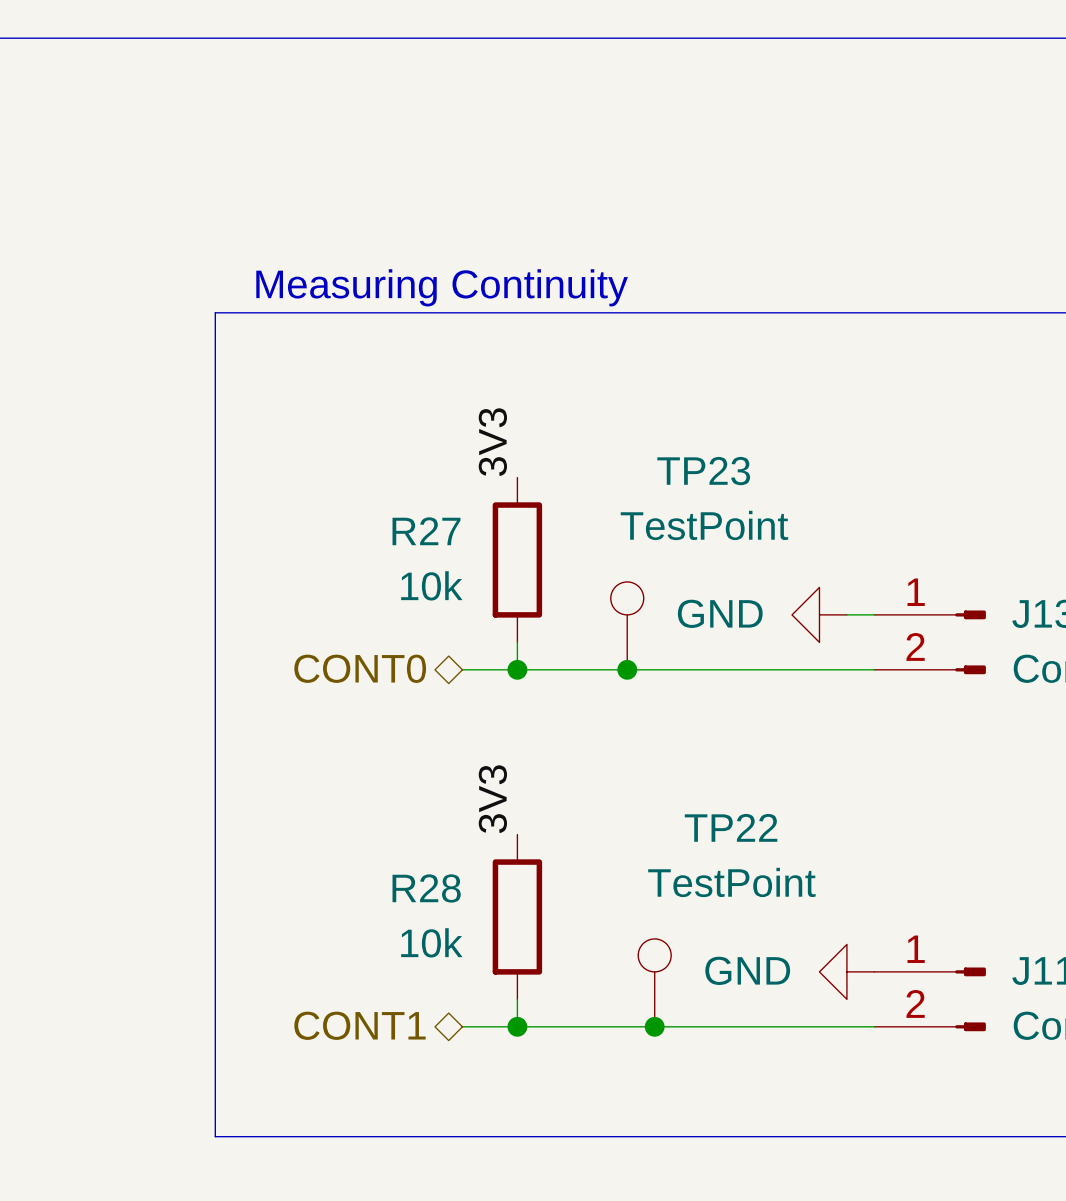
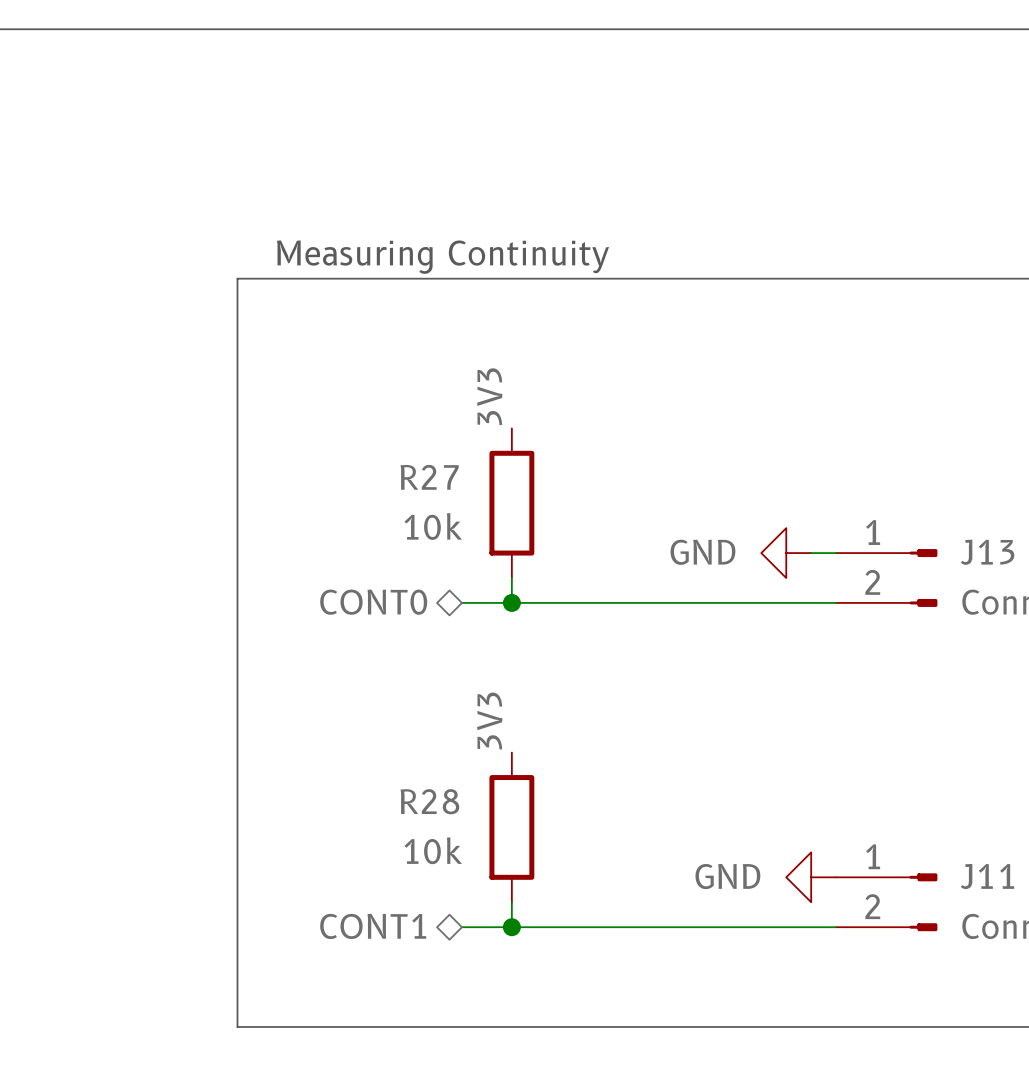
TP23: TestPoint (627, 625) -> none
junction: (627, 669) -> none
TP22: TestPoint (654, 982) -> none
junction: (654, 1026) -> none

